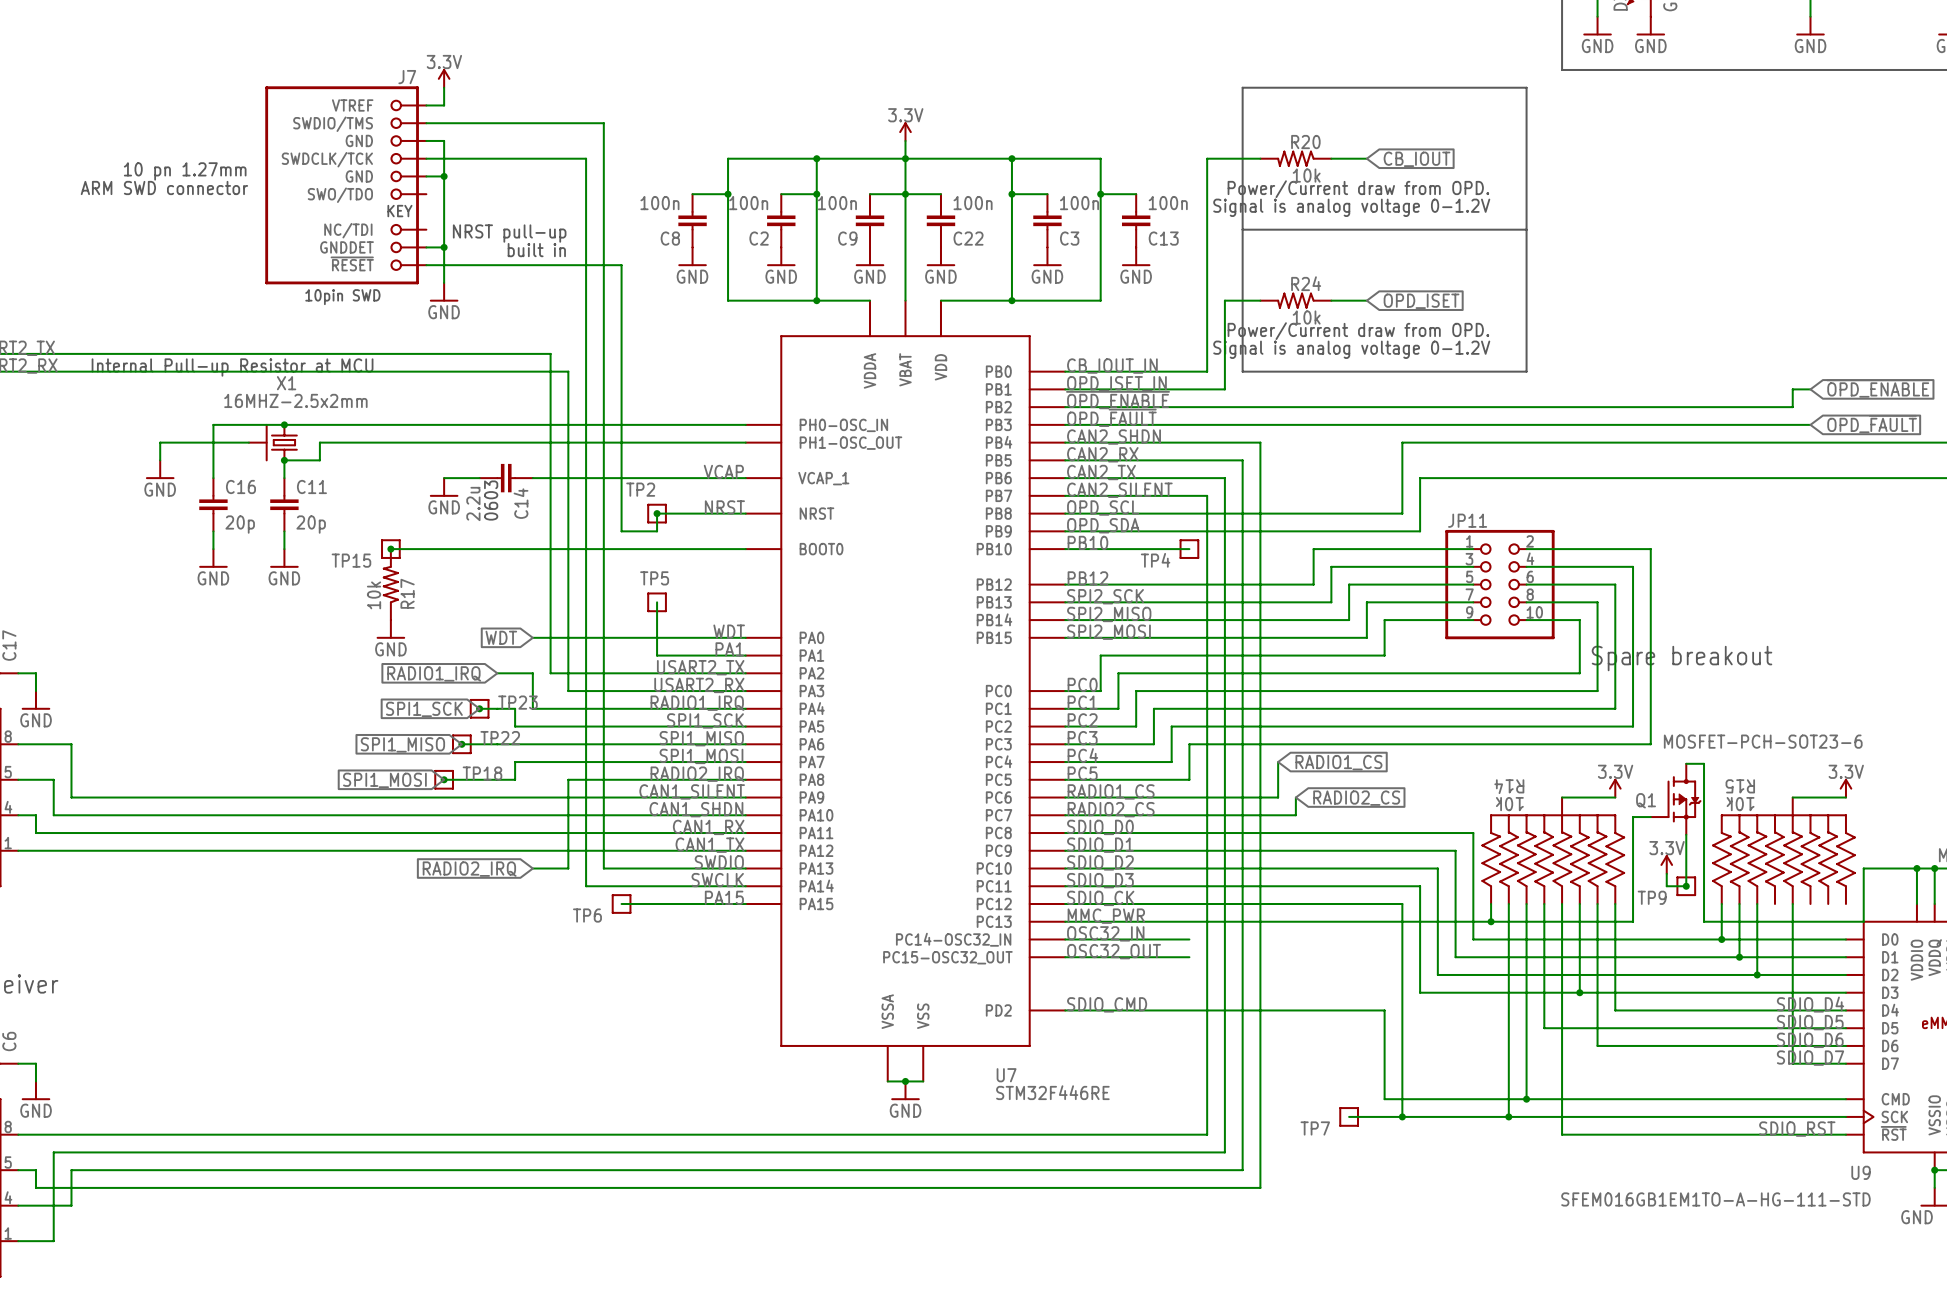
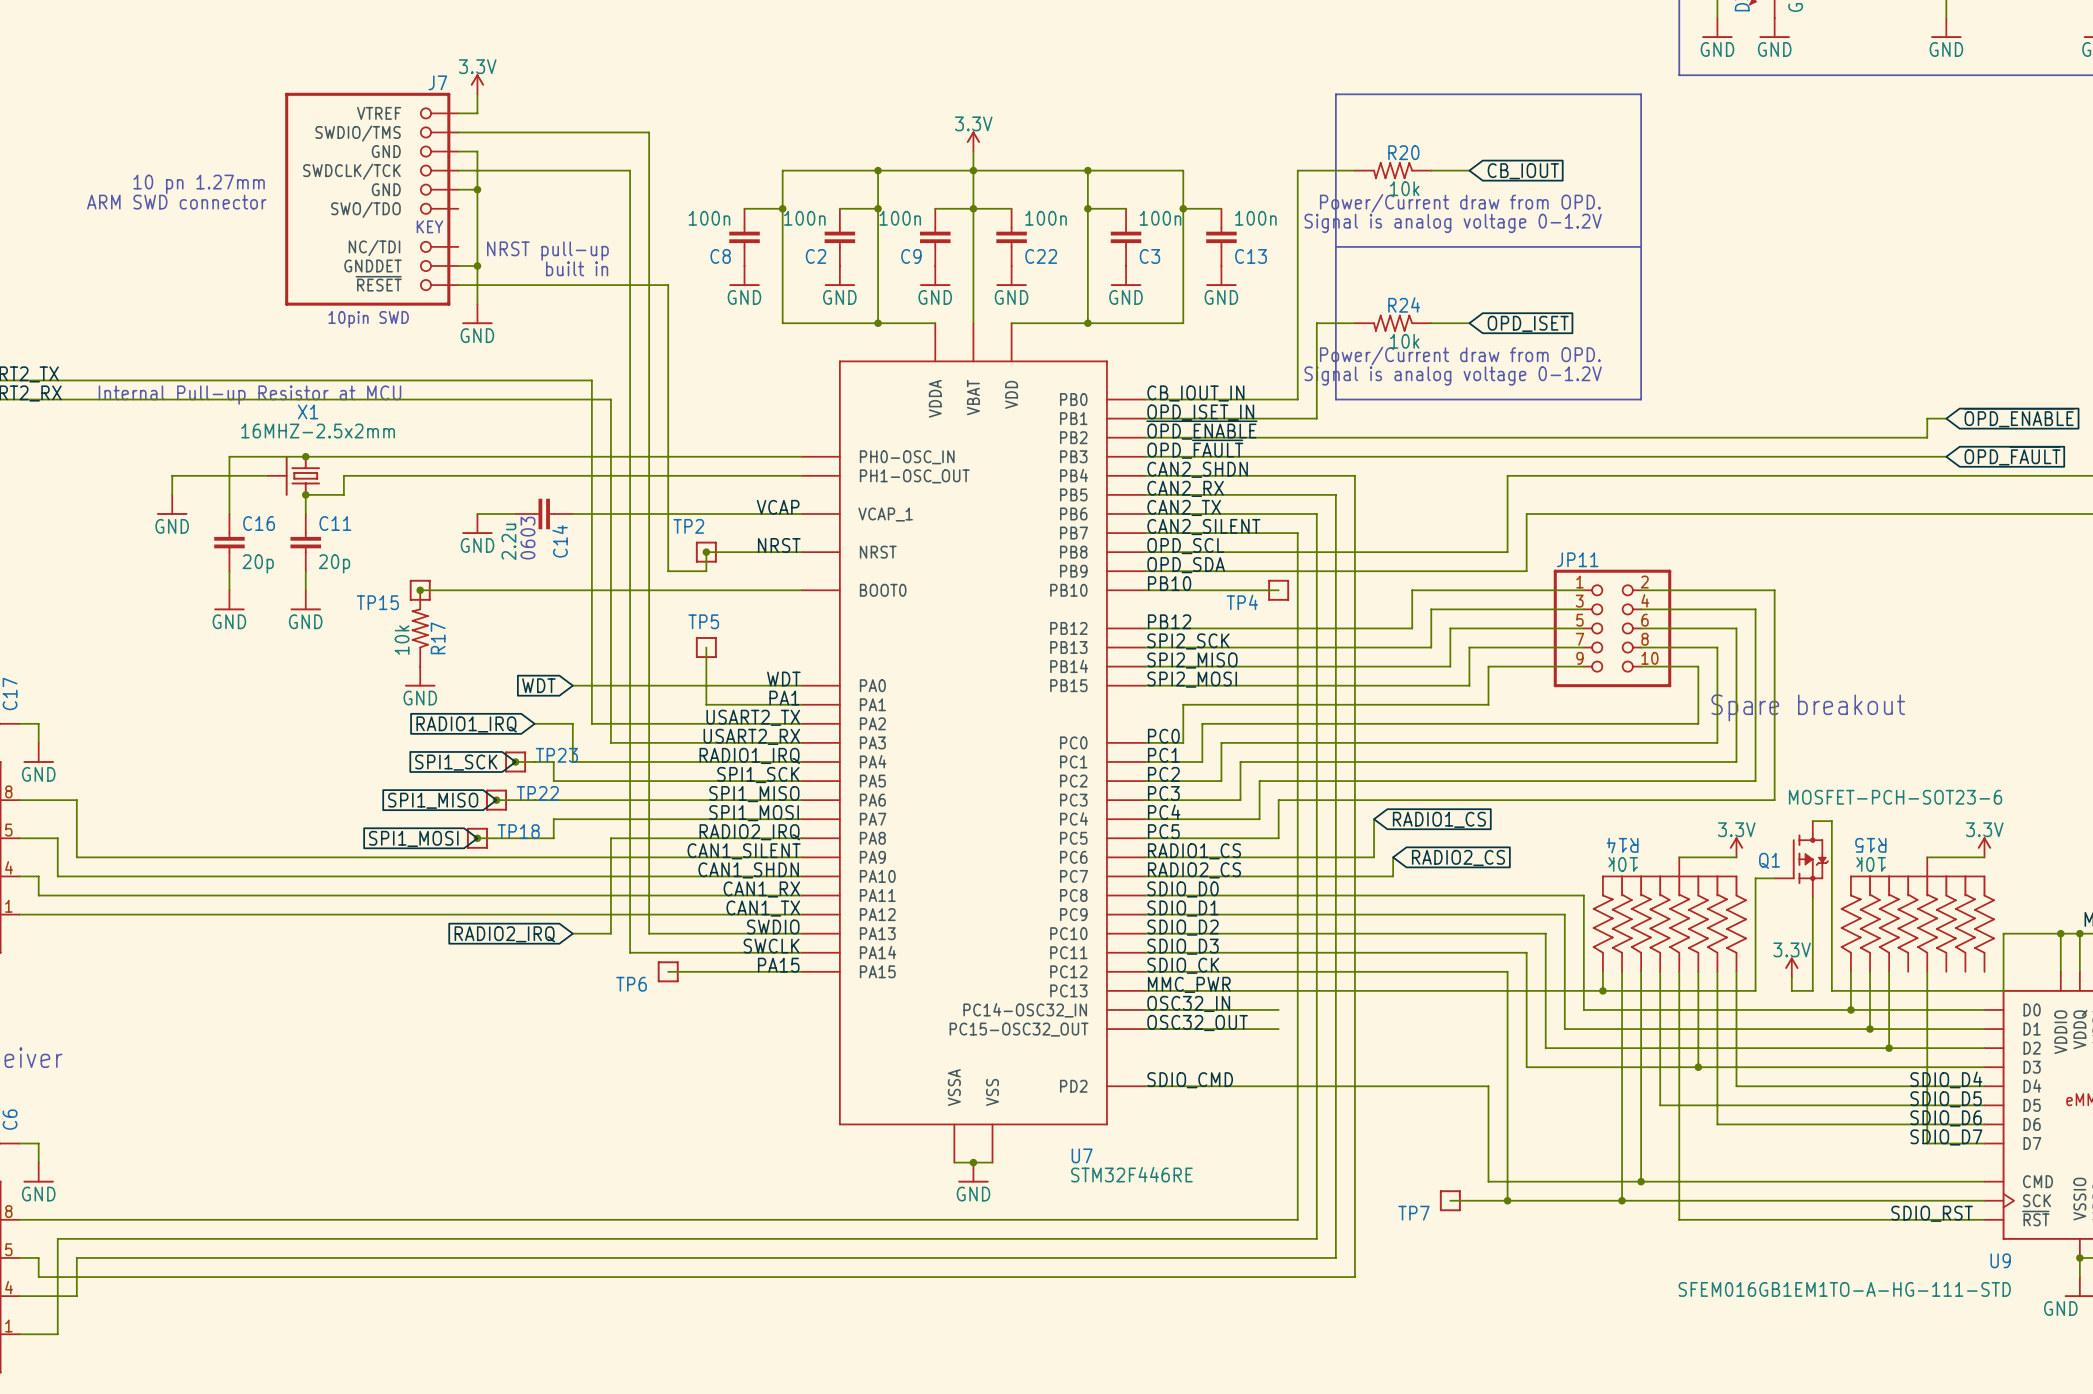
power symbol position: 3.3V (1666, 864) -> 3.3V (1791, 967)
wire: (1666, 873) (1666, 886) (1686, 886) -> (1791, 977) (1791, 990) (1812, 990) (1812, 952)
TP9: (1686, 886) -> none
junction: (1686, 886) -> none

